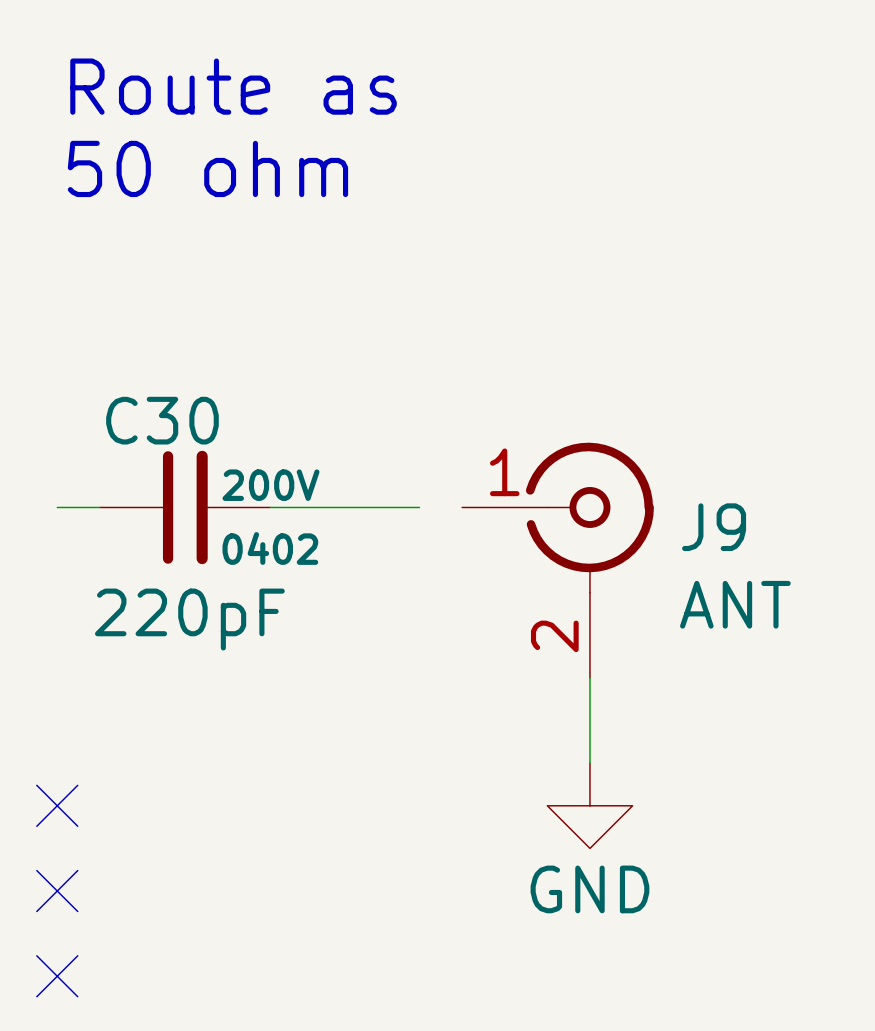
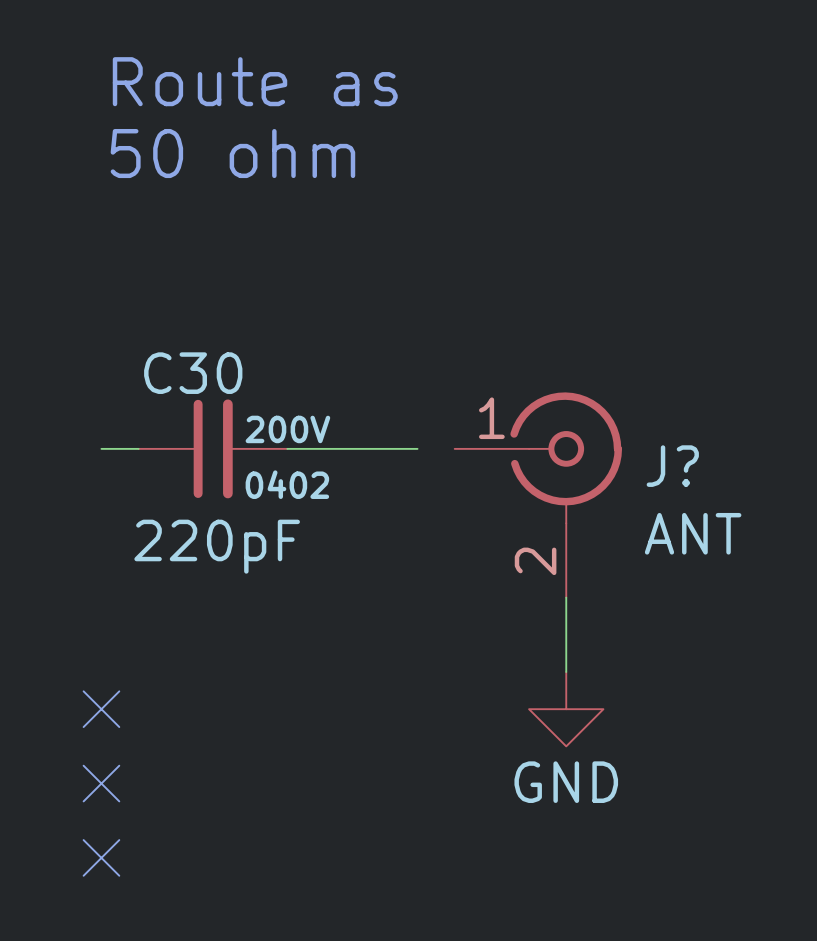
J9 name: J9 (714, 527) -> J? (672, 466)

